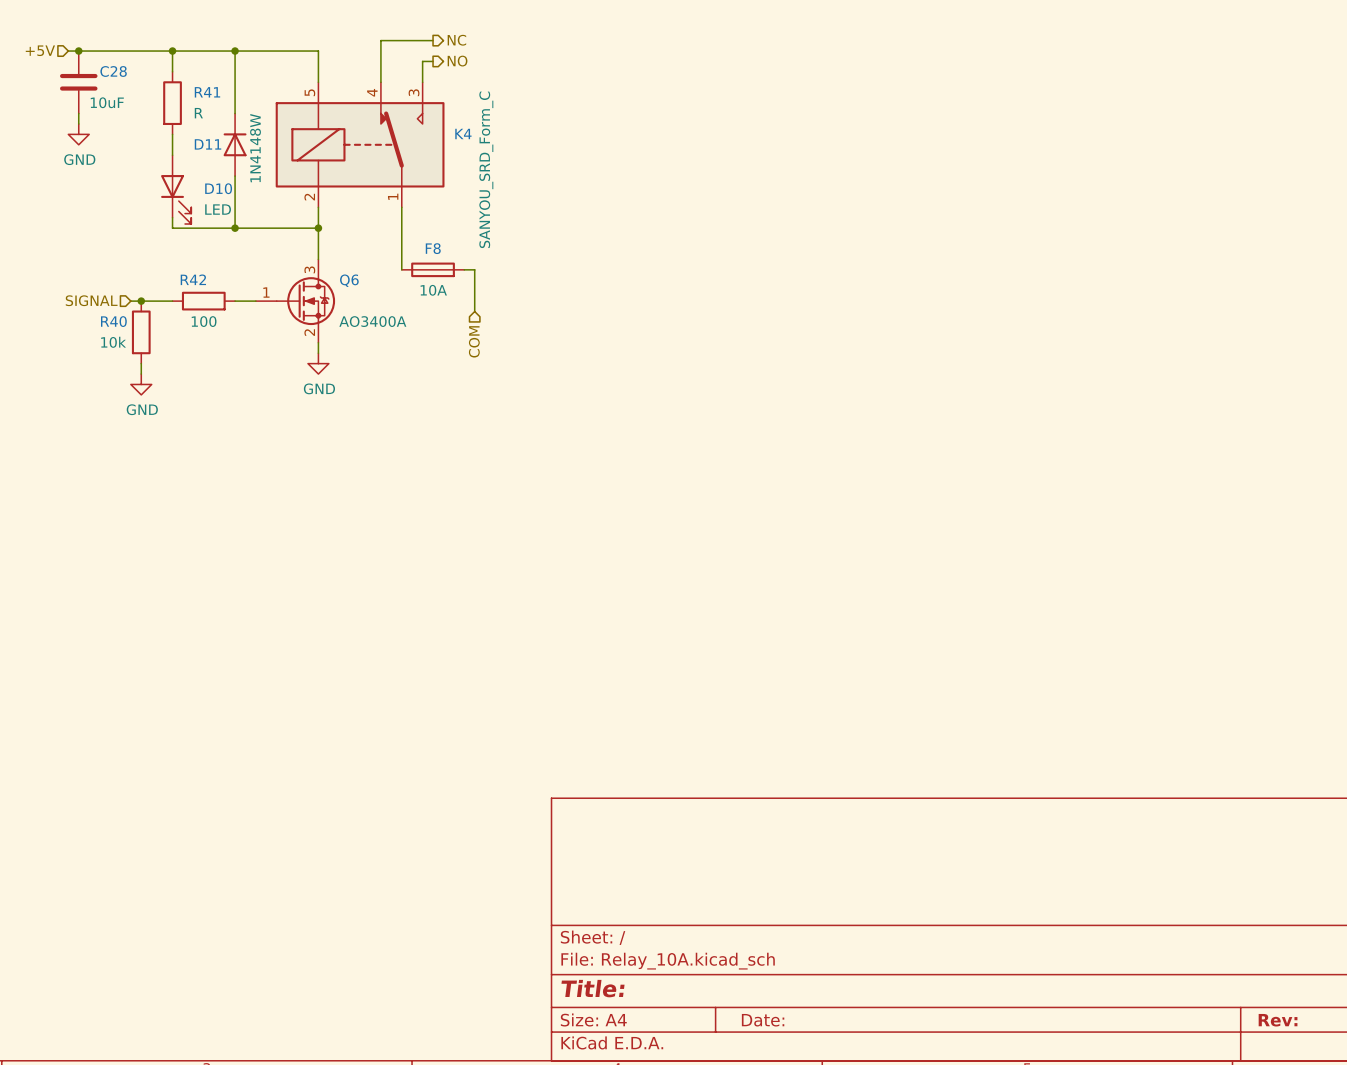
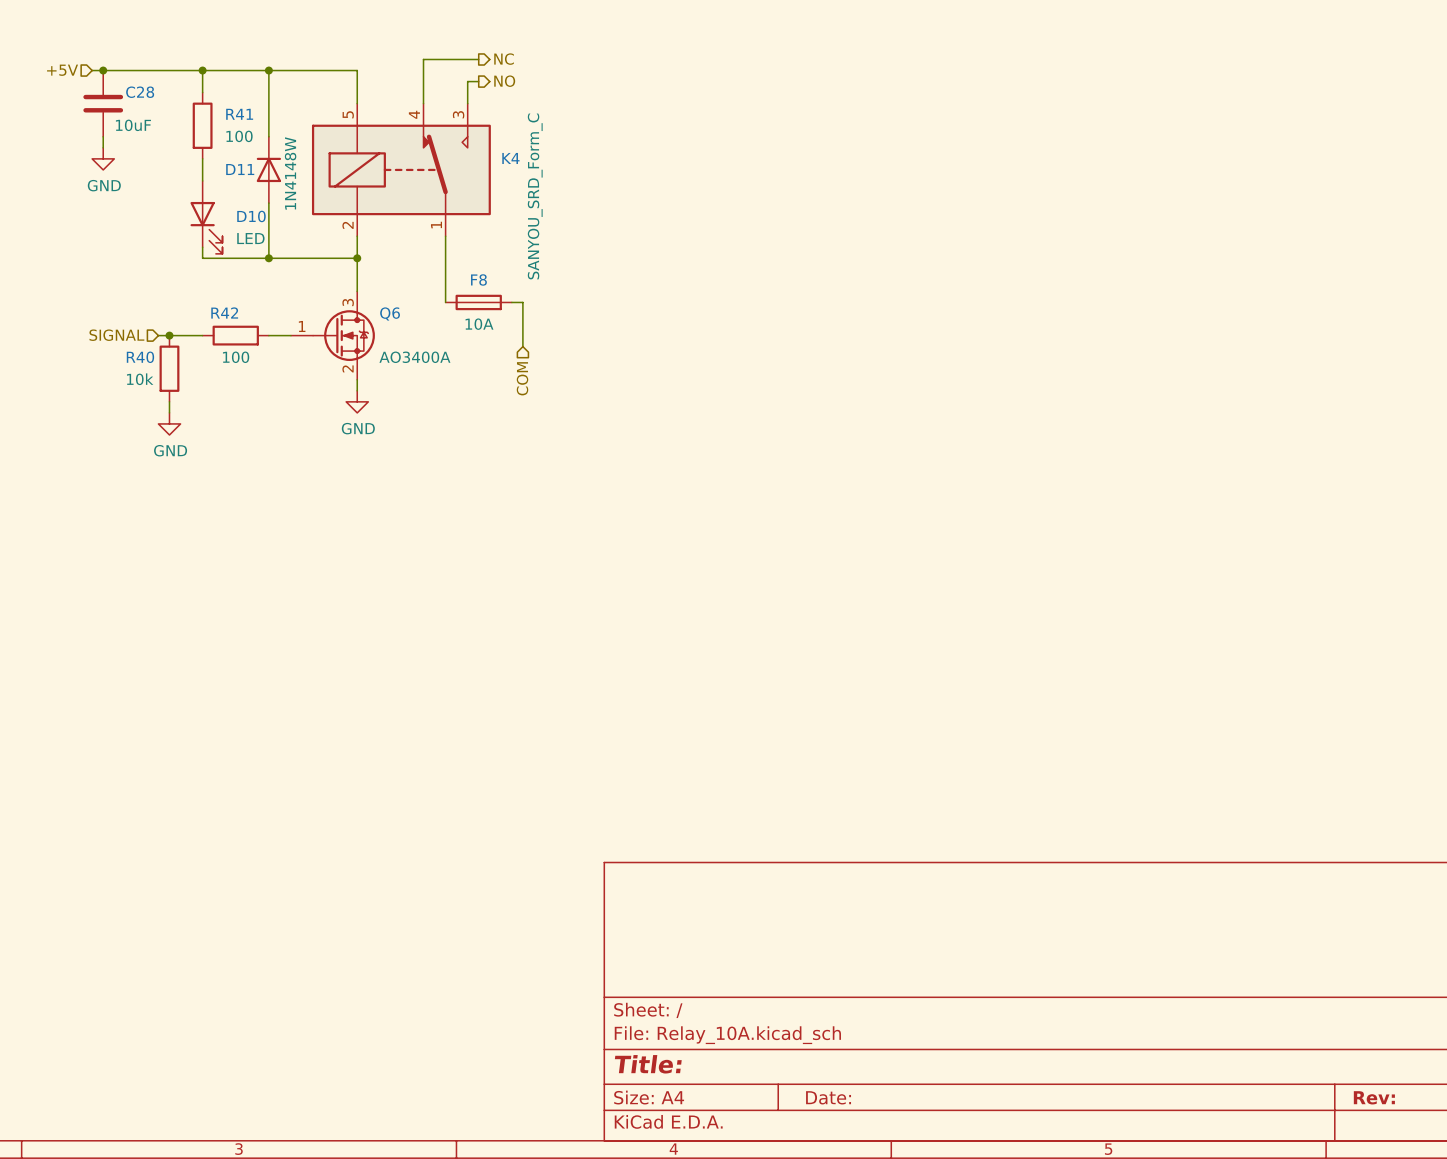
R41 value: R (198, 113) -> 100 (239, 136)

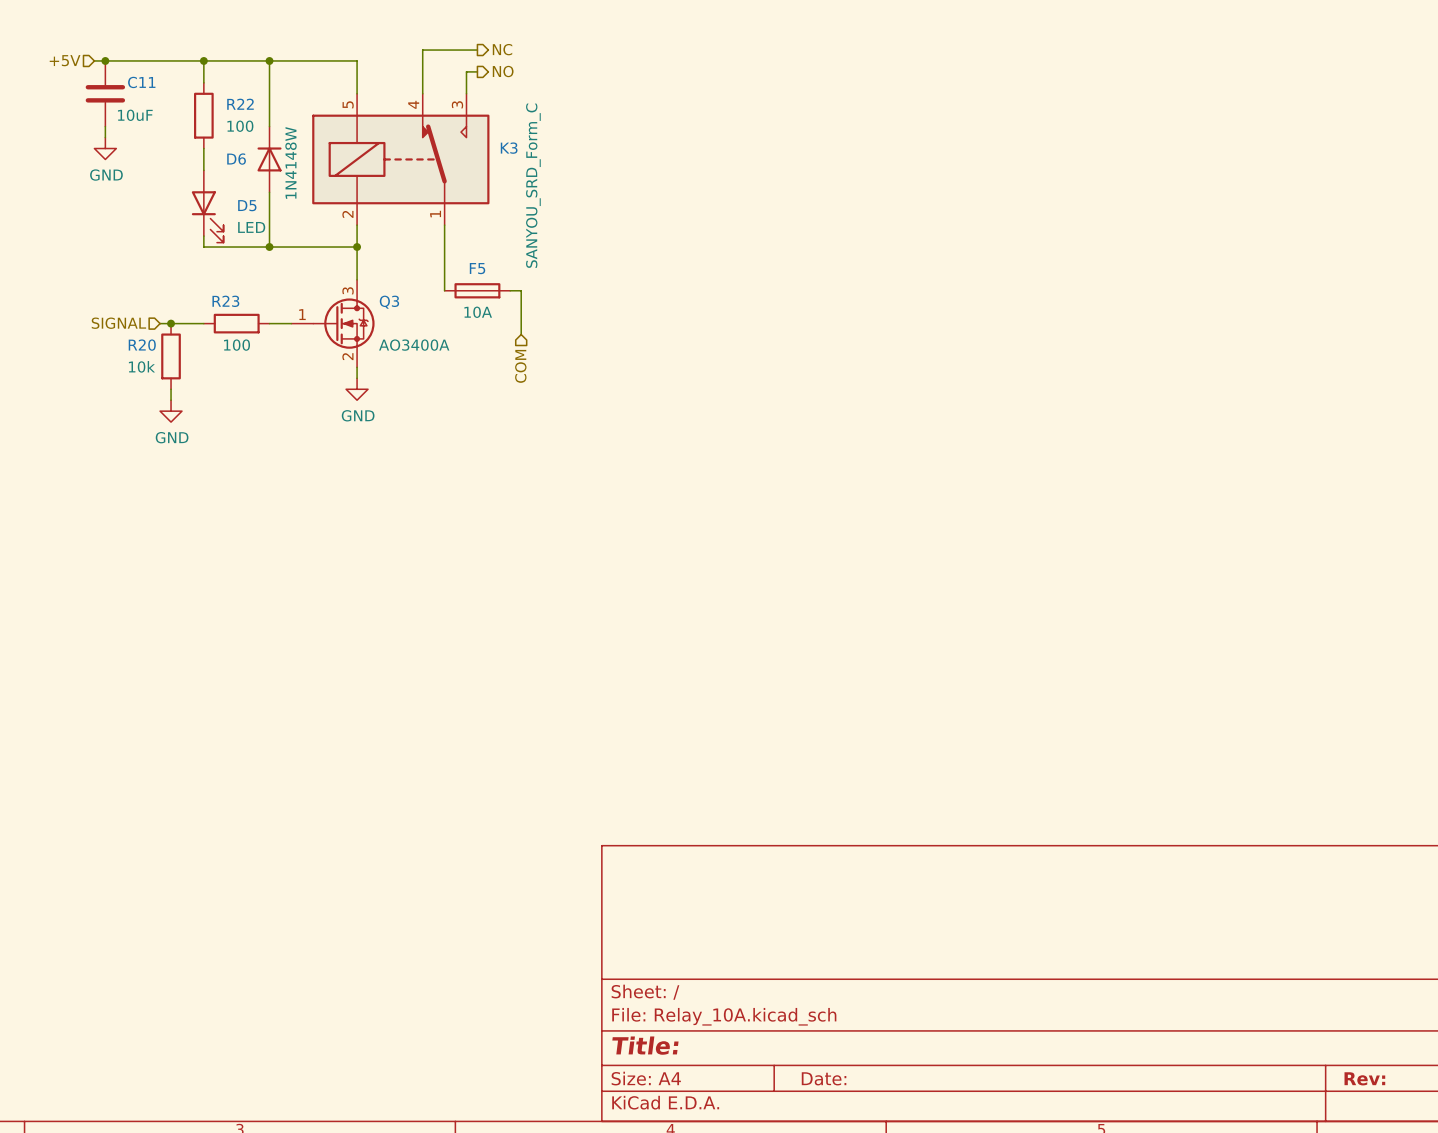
C28 name: C28 (140, 92) -> C11 (141, 82)
R41 name: R41 (239, 114) -> R22 (240, 104)
K4 name: K4 (510, 158) -> K3 (509, 148)
D11 name: D11 (240, 169) -> D6 (236, 159)
D10 name: D10 (251, 216) -> D5 (247, 205)
F8 name: F8 (478, 279) -> F5 (477, 268)
R42 name: R42 (224, 313) -> R23 (225, 301)
Q6 name: Q6 (390, 313) -> Q3 (389, 302)
R40 name: R40 (140, 357) -> R20 (142, 345)

